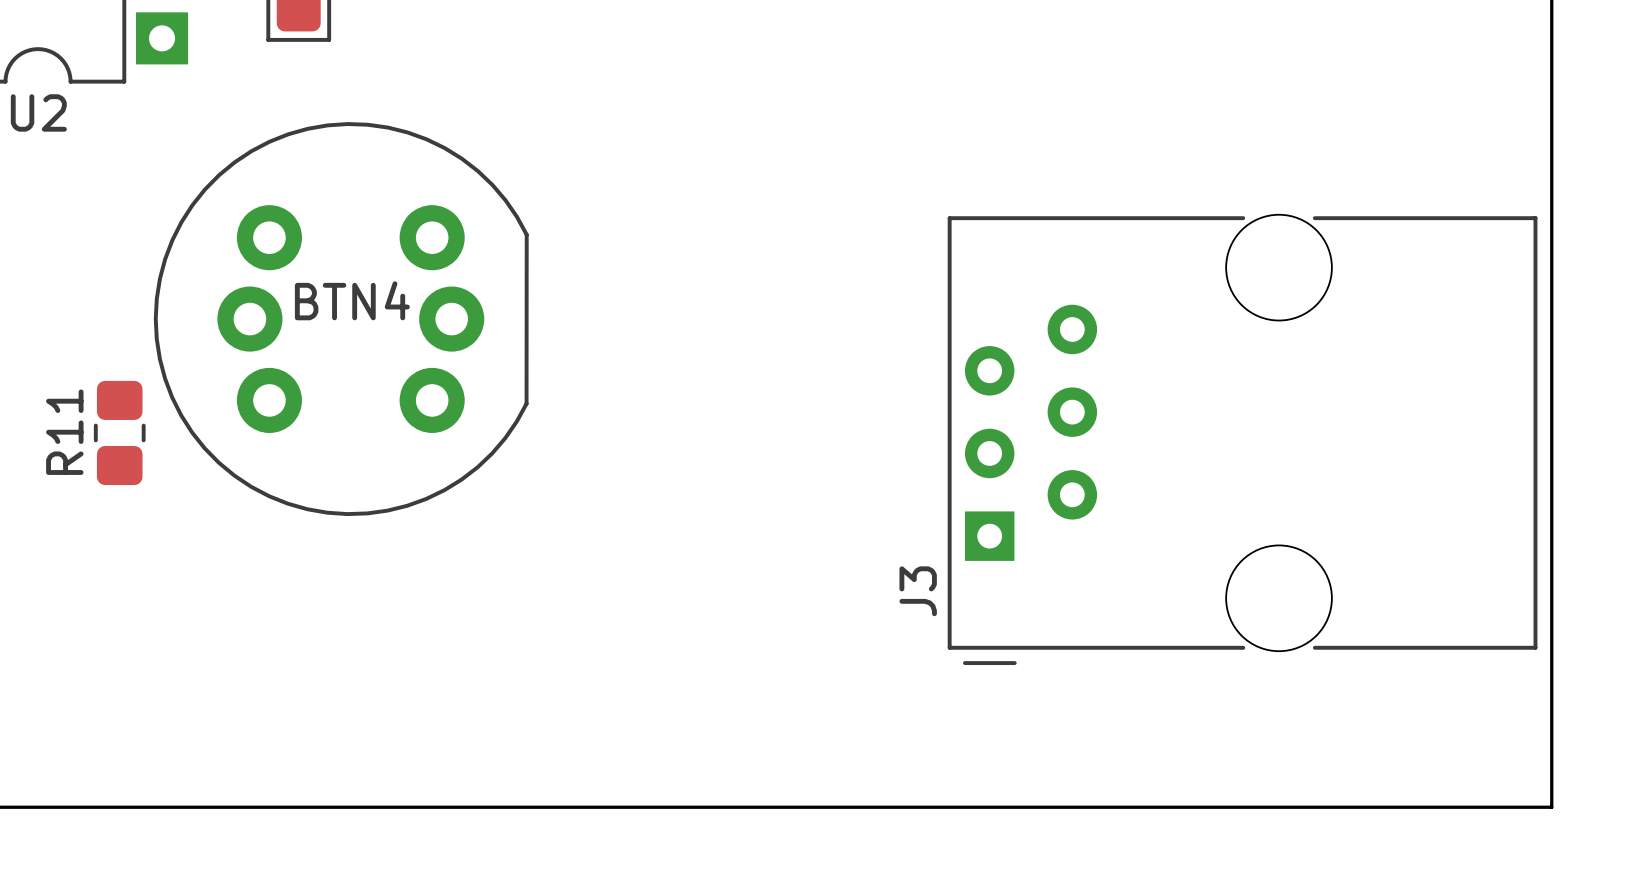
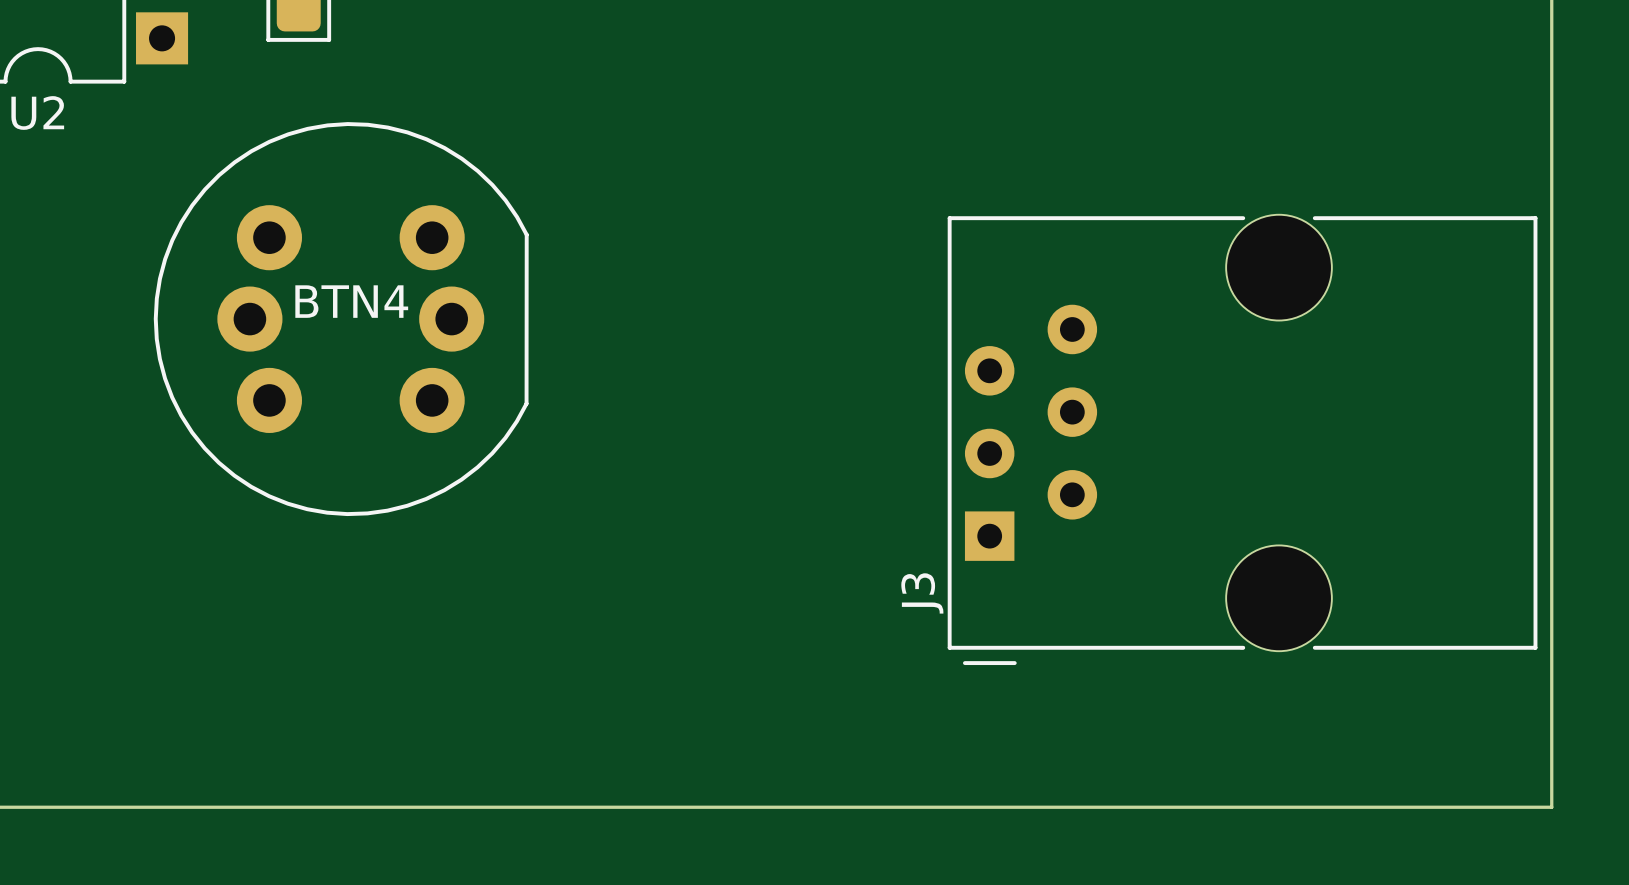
R11: (119, 432) -> none

